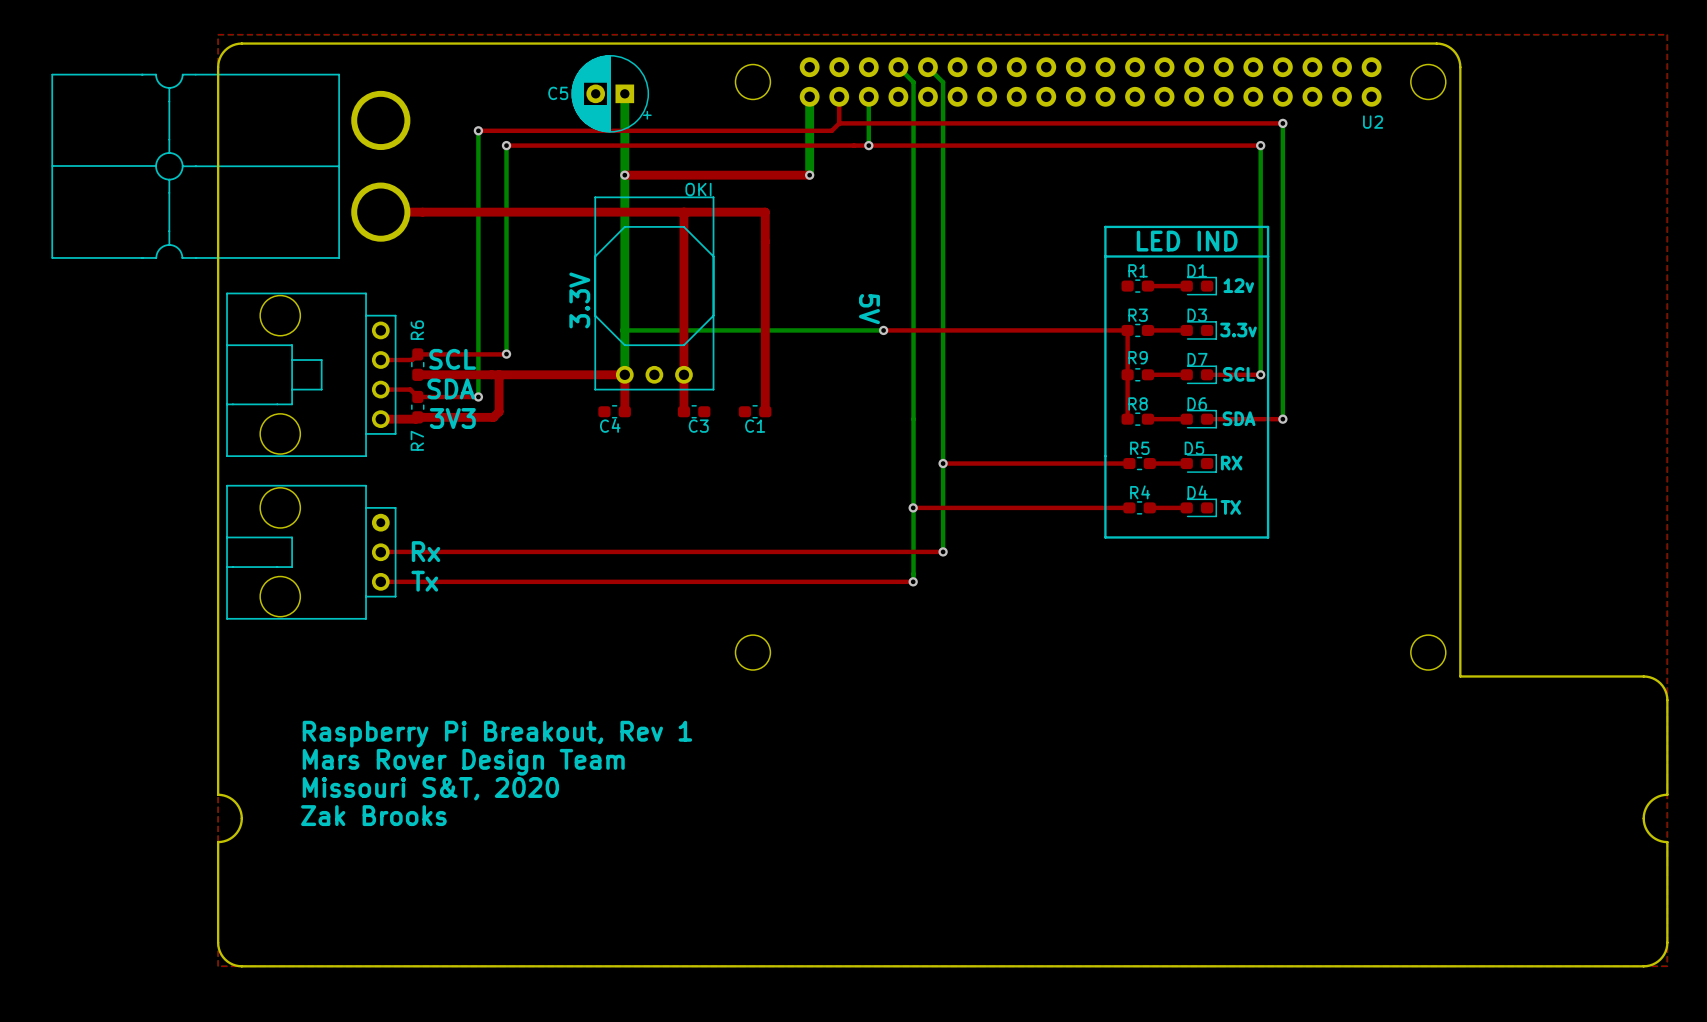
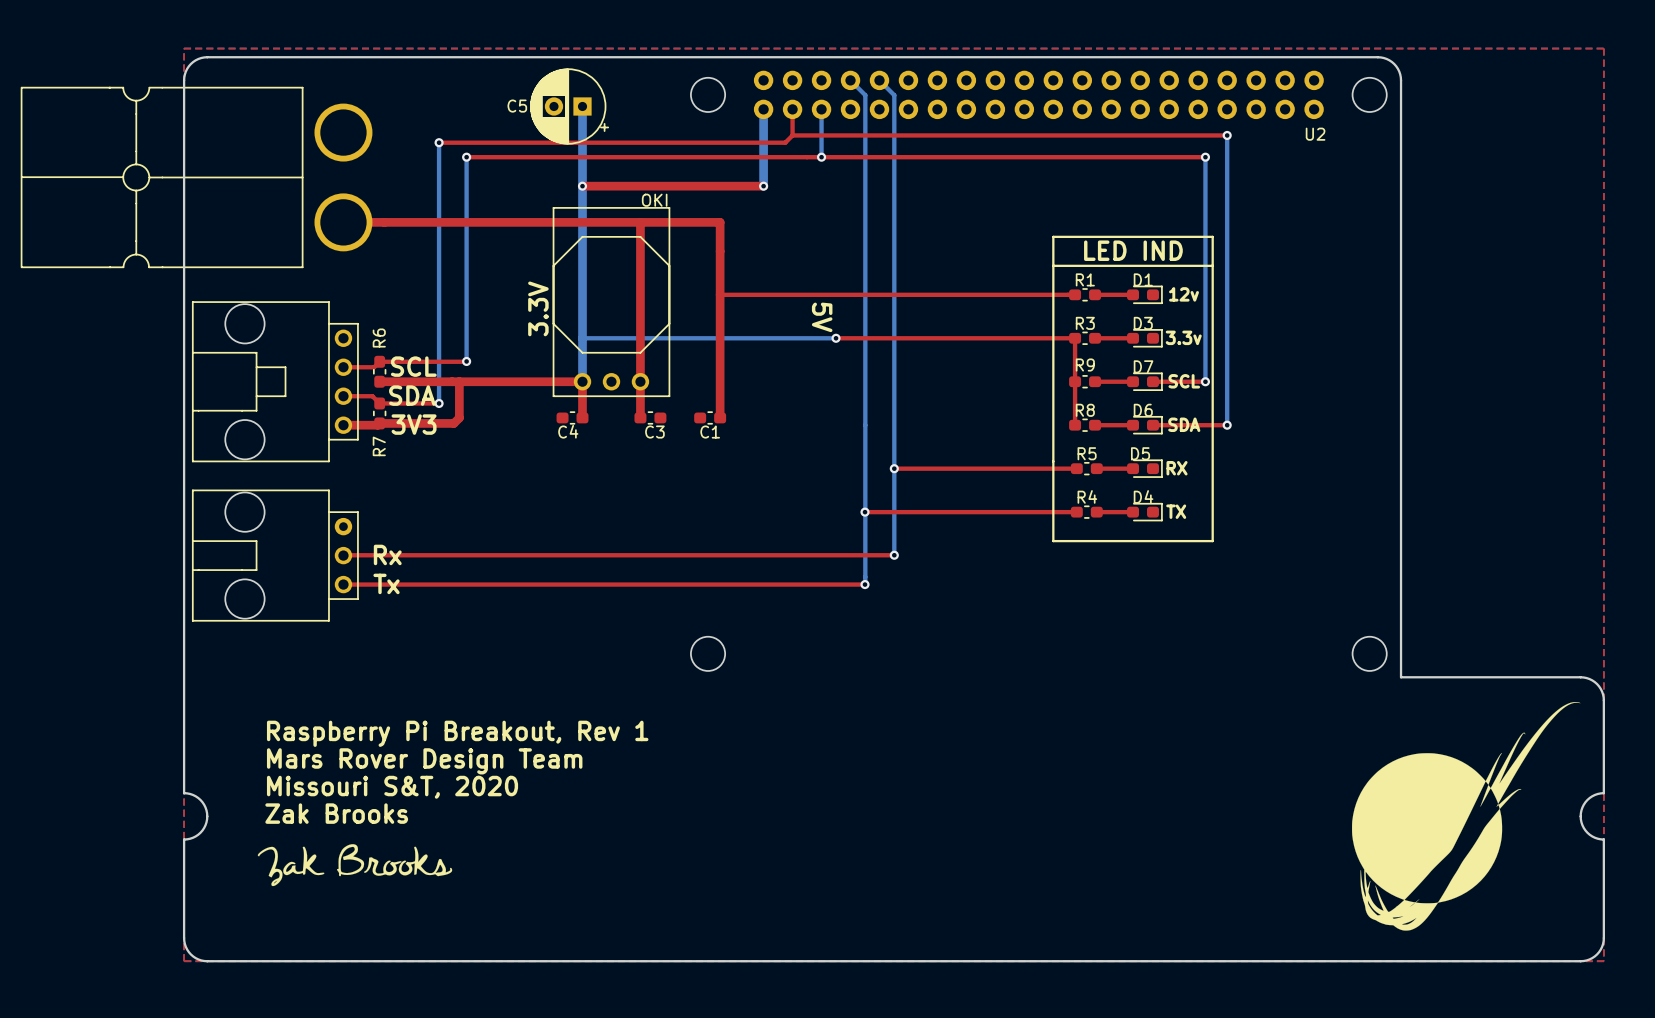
top track: none -> (720, 294) (1075, 294)
drawing: none -> [1351, 702, 1581, 931]
drawing: none -> [257, 844, 453, 887]

